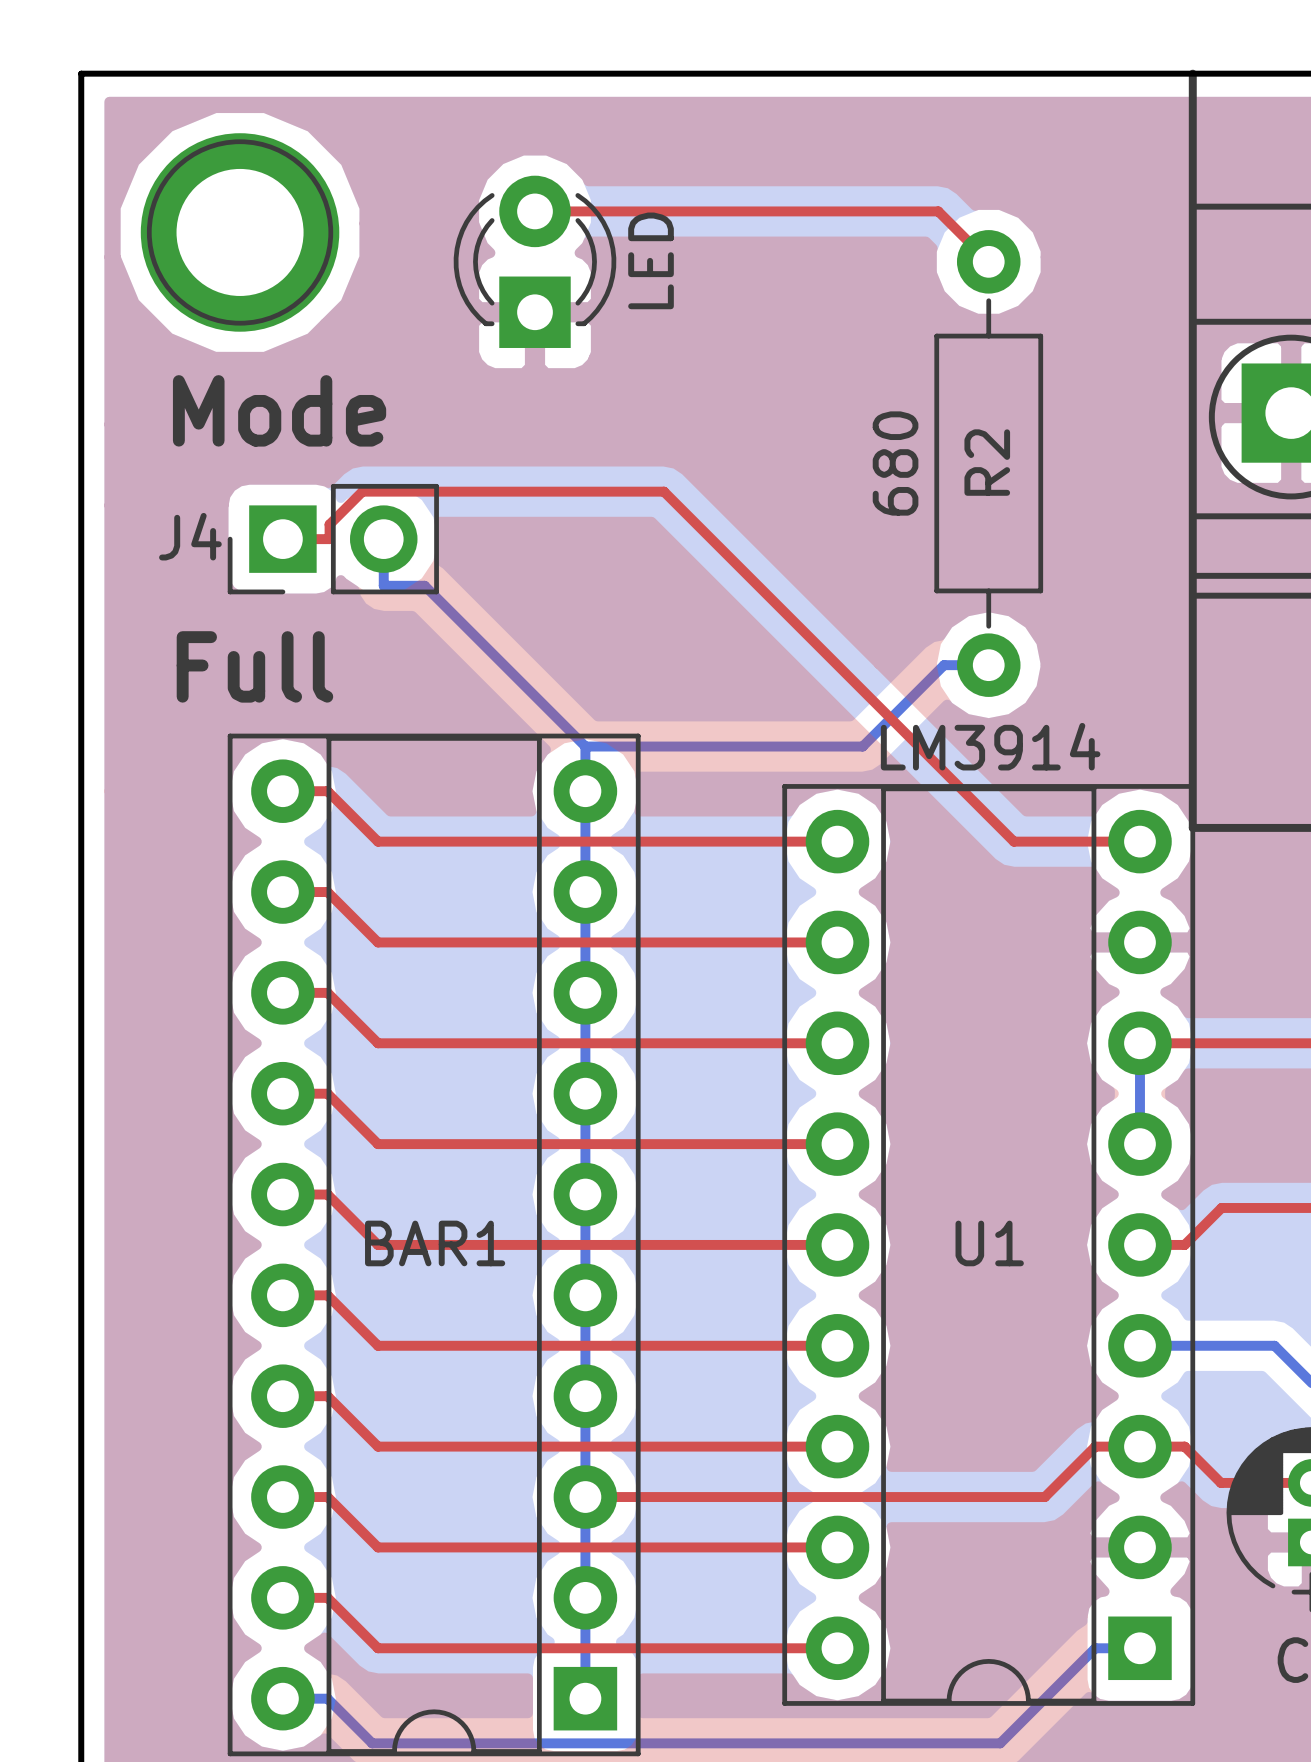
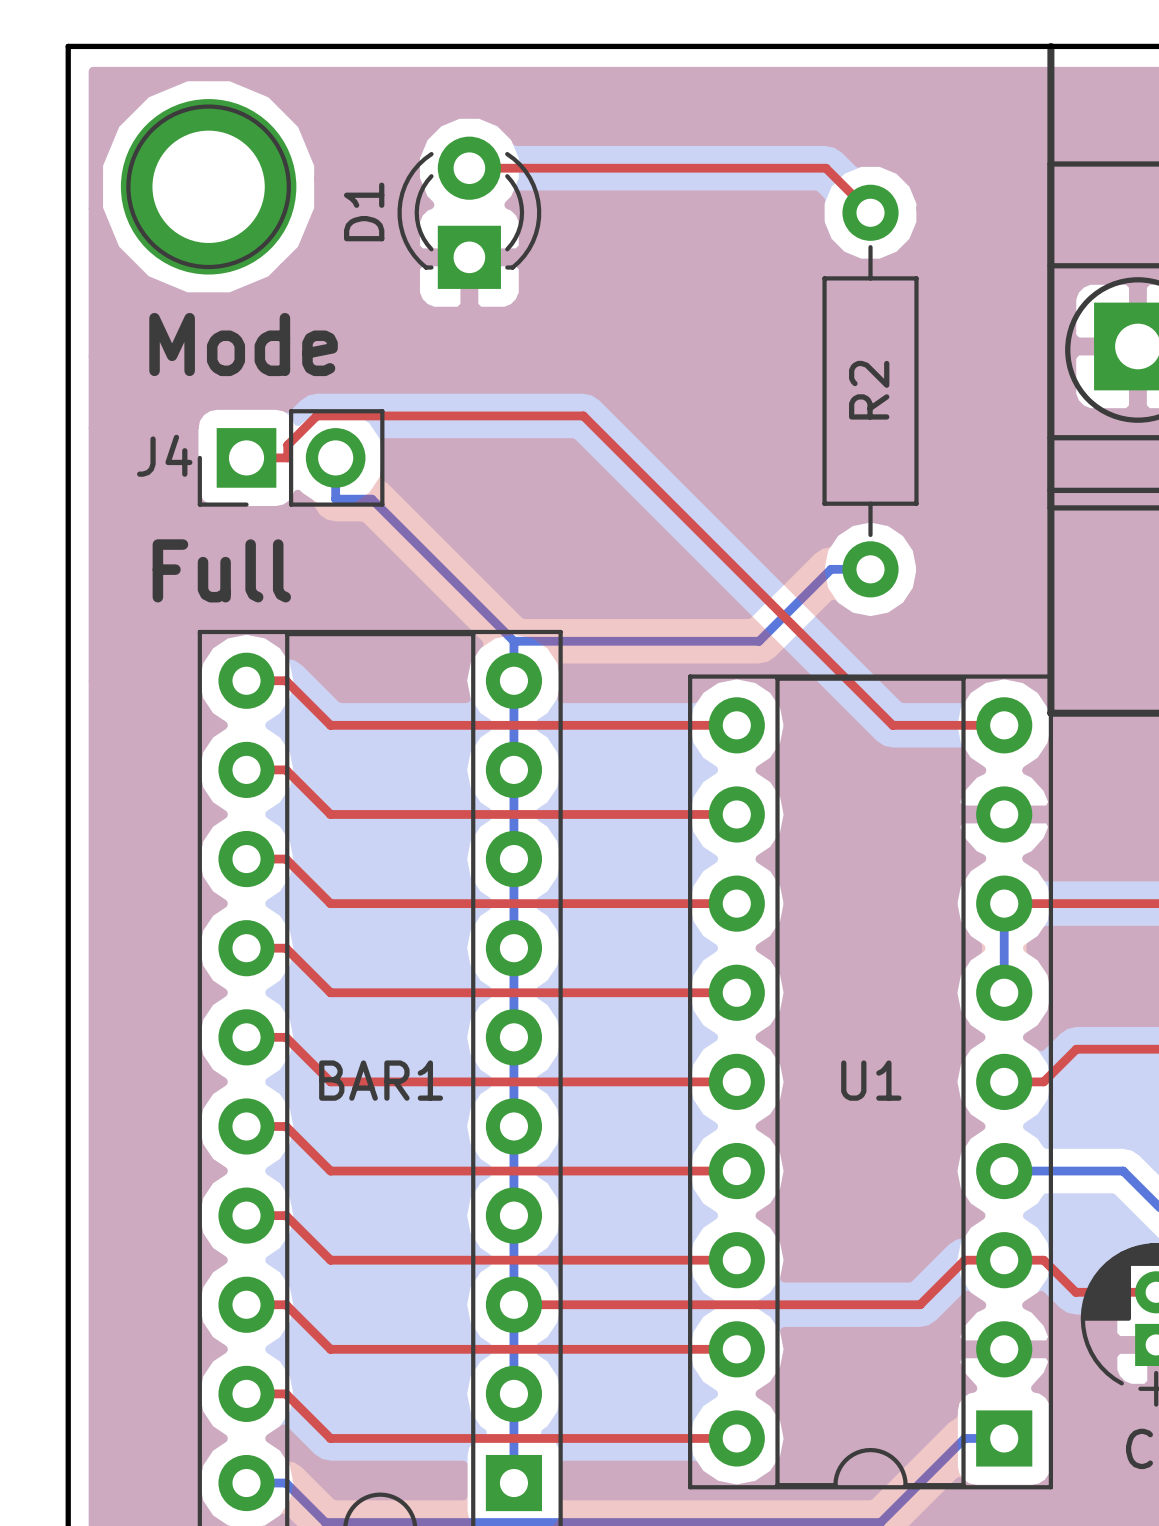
D1 name: none -> D1 (364, 211)
D1 value: LED (651, 260) -> none
R2 value: 680 (895, 463) -> none
U1 value: LM3914 (990, 746) -> none

